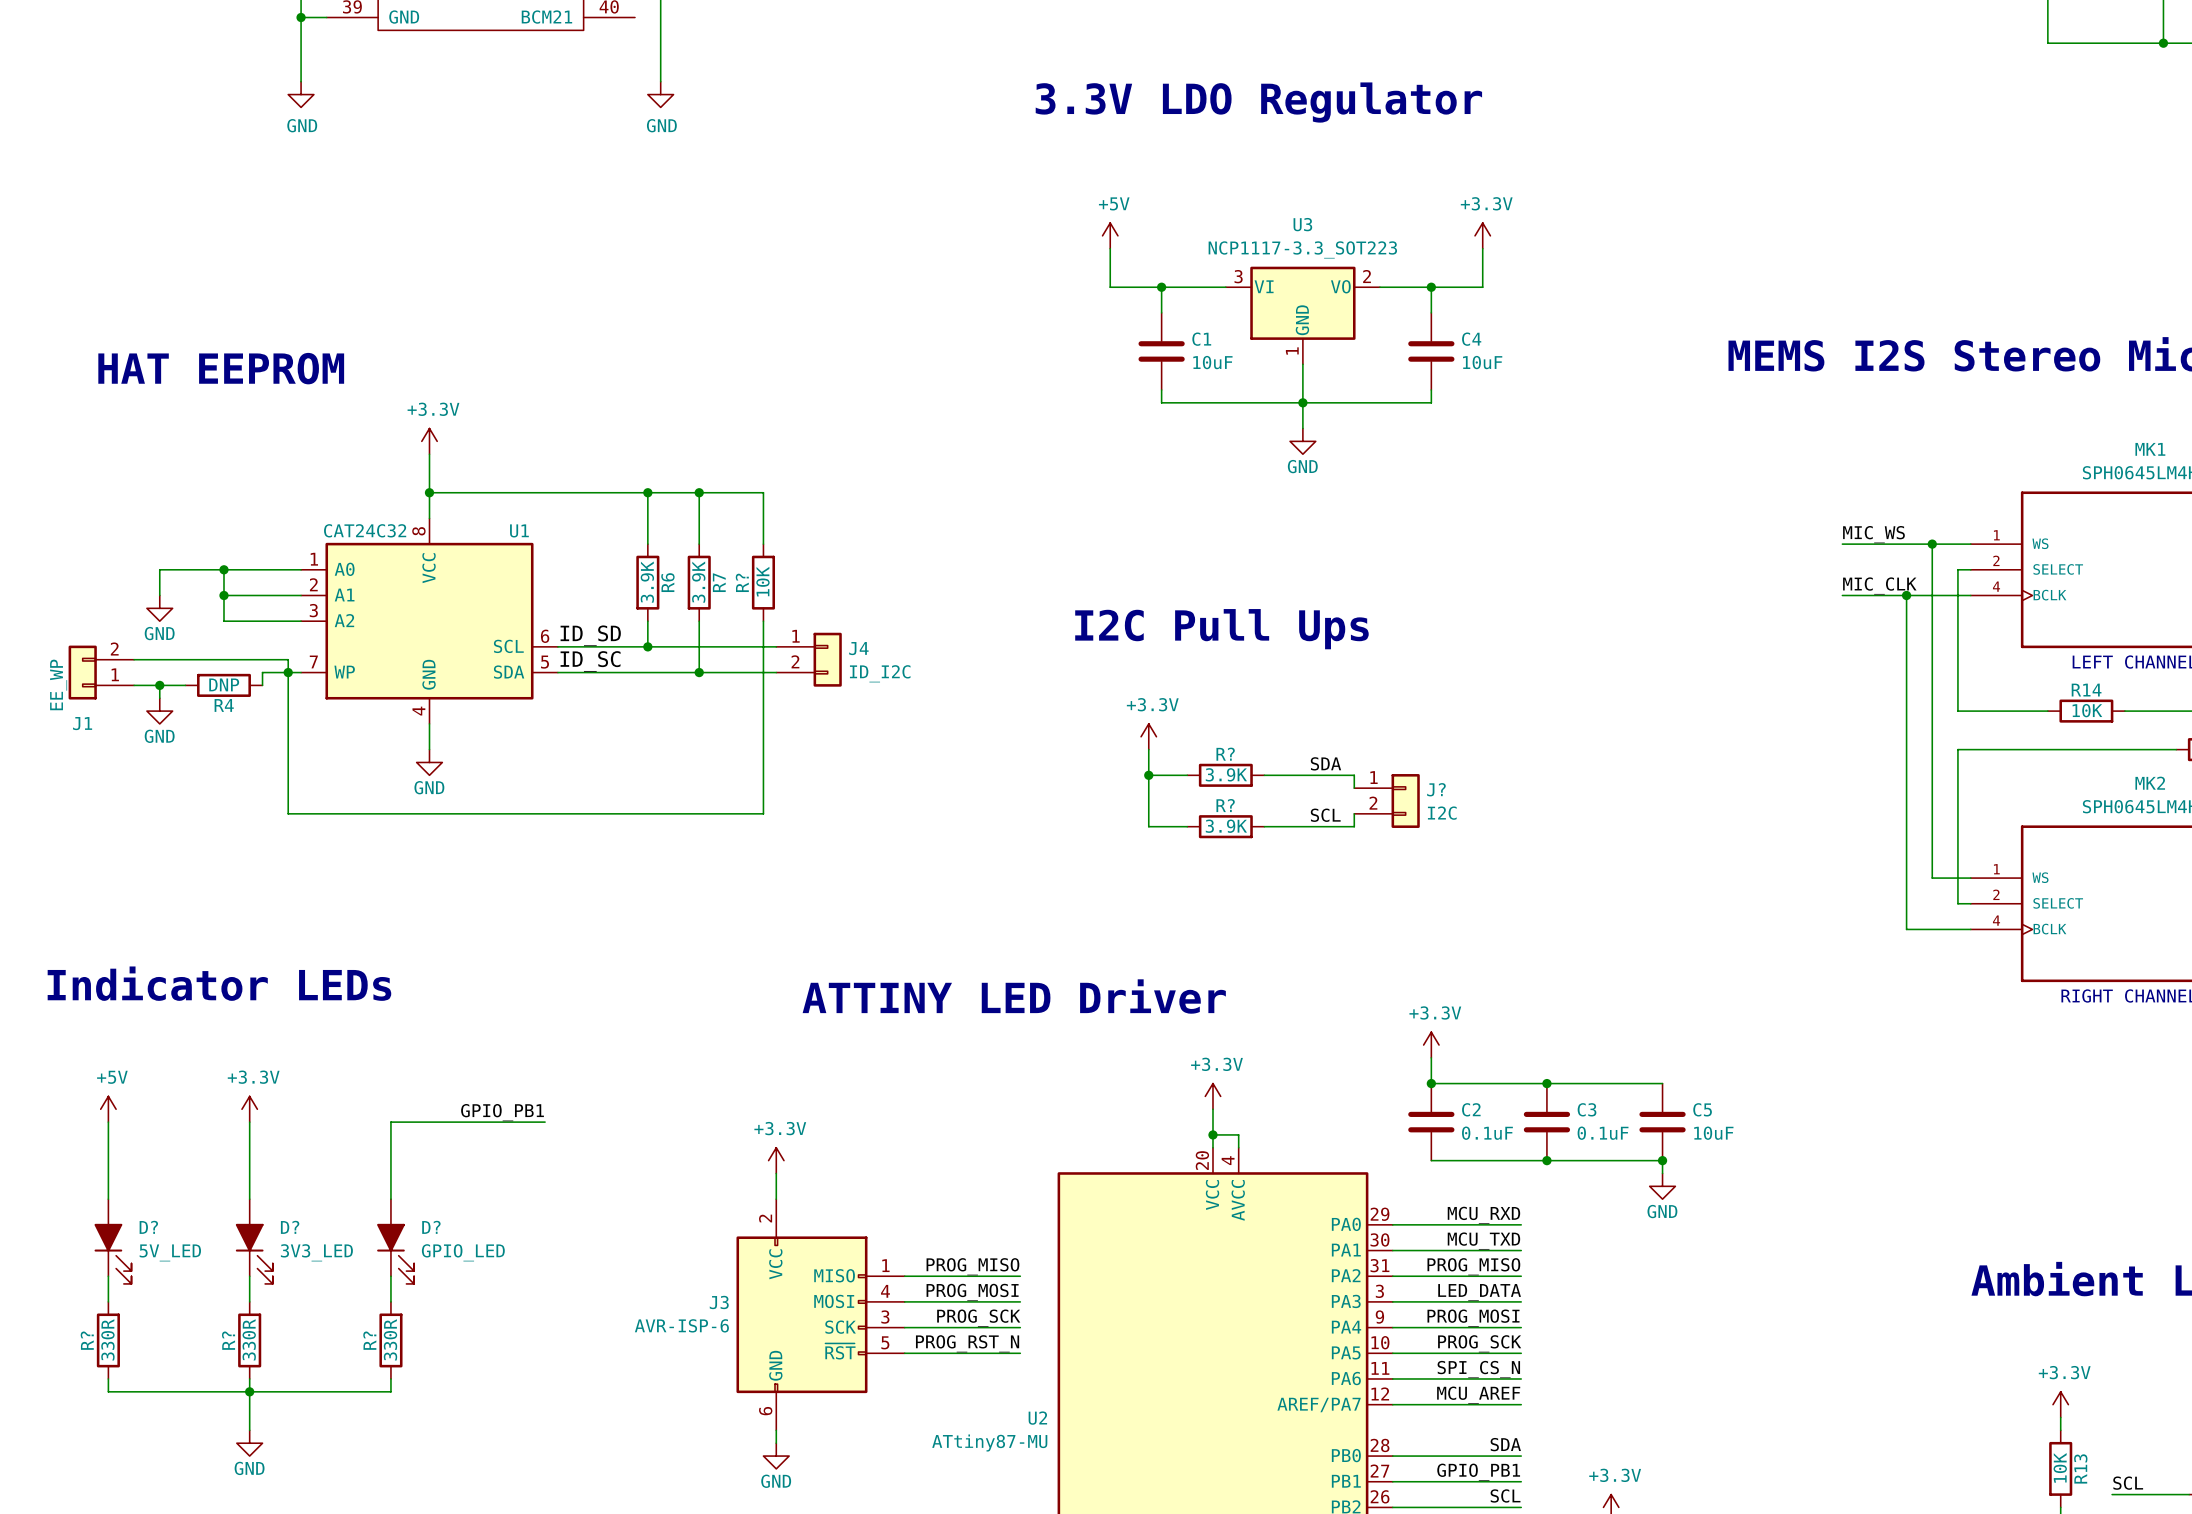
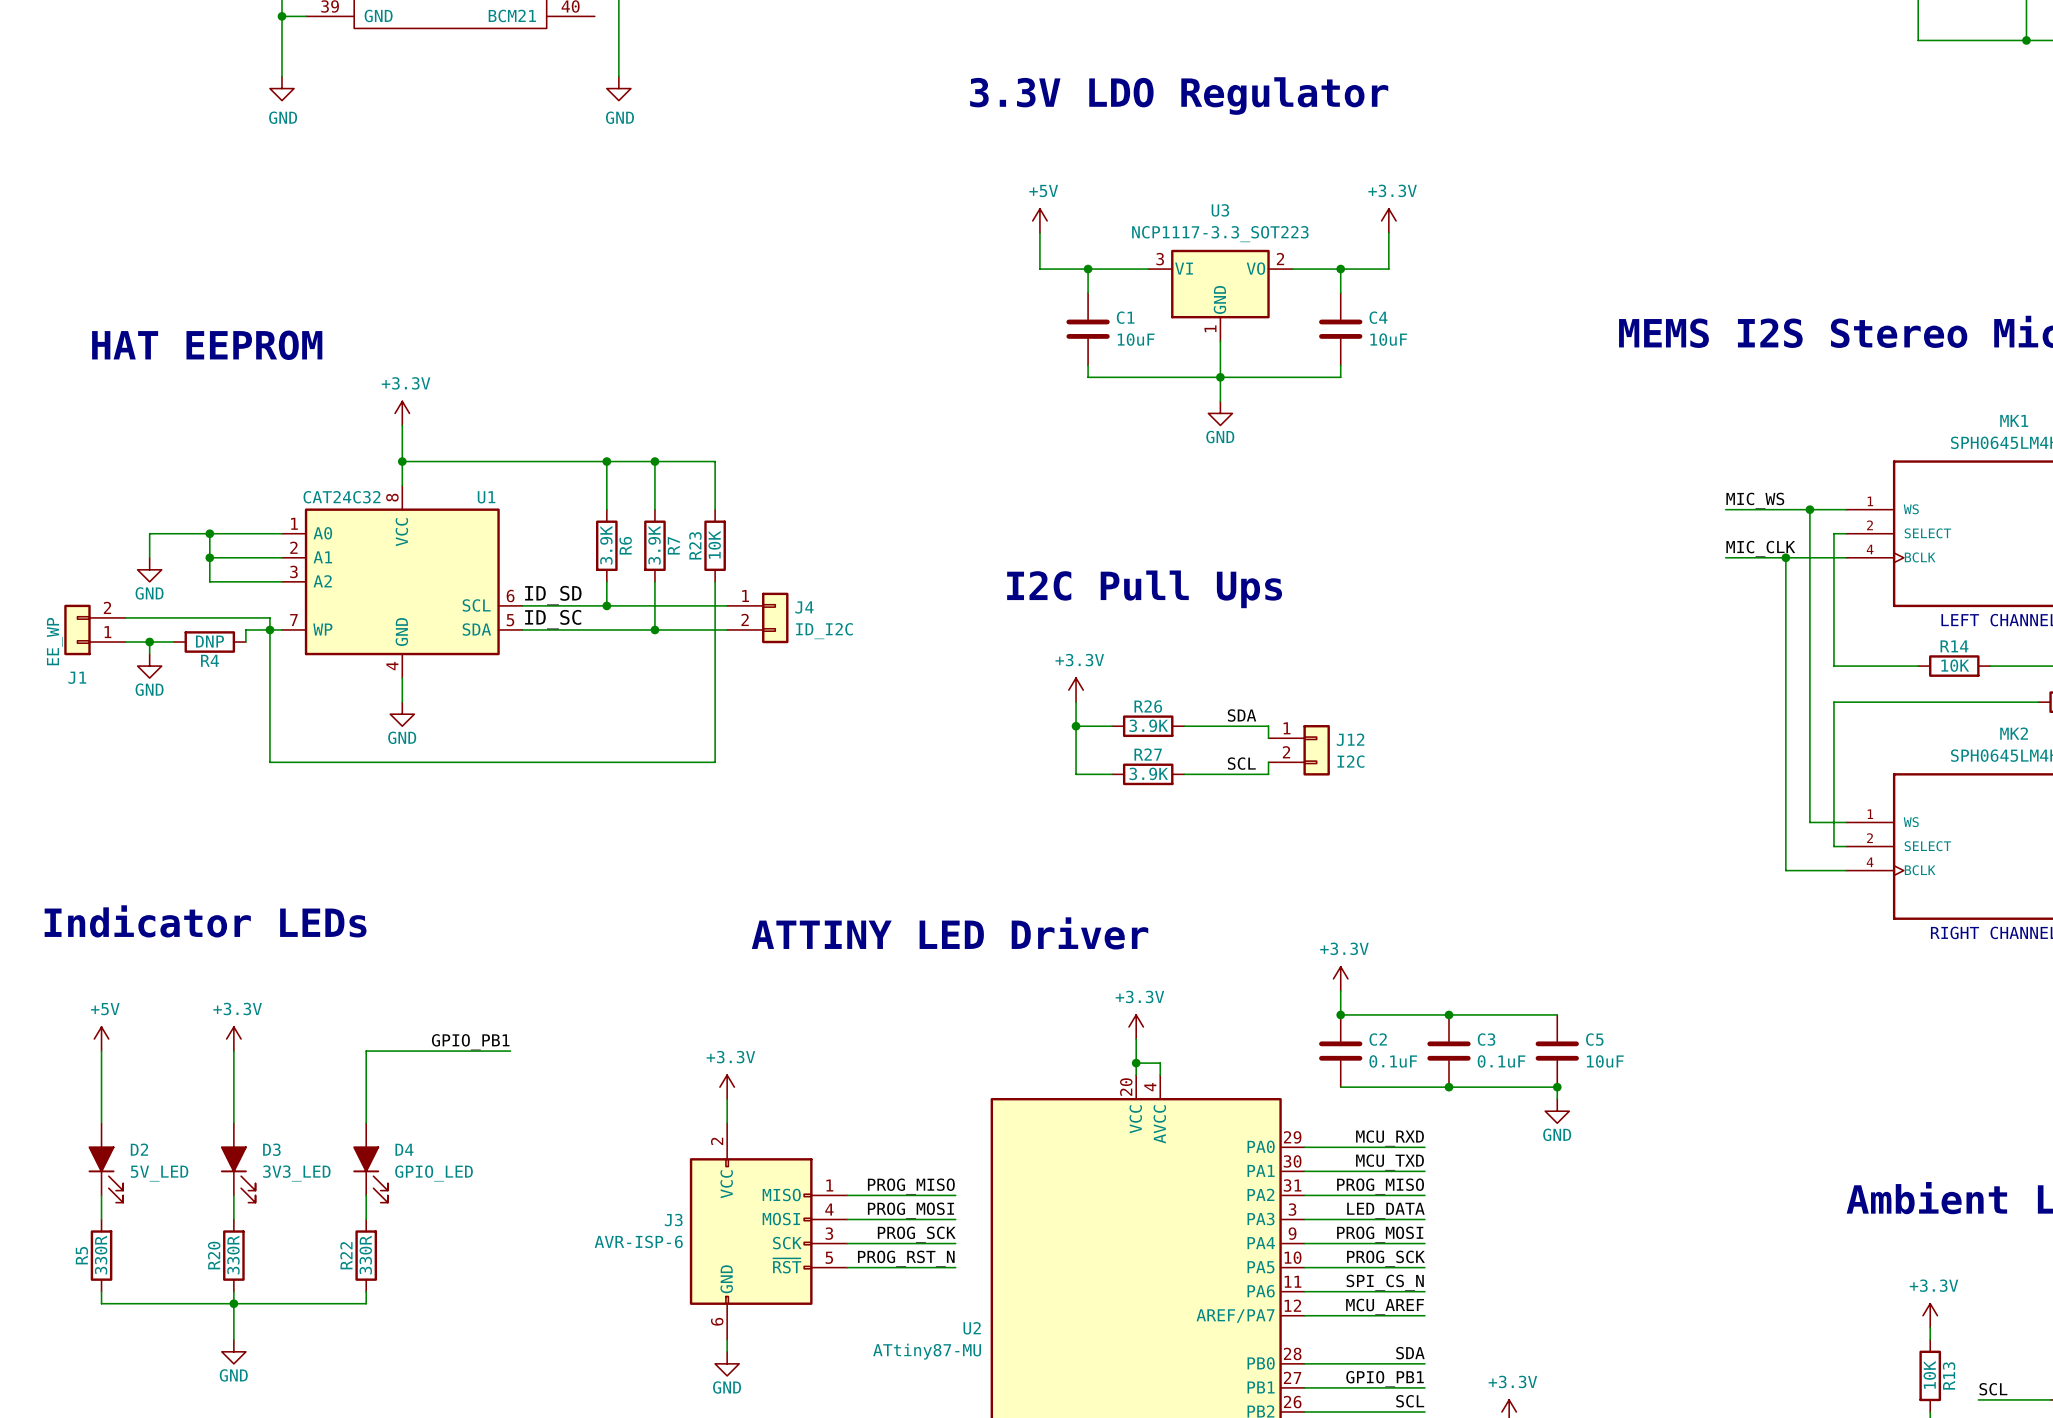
R? name: R? (742, 582) -> R23 (695, 545)
R? name: R? (1225, 754) -> R26 (1148, 706)
J? name: J? (1436, 789) -> J12 (1350, 739)
R? name: R? (1225, 805) -> R27 (1148, 754)
D? name: D? (148, 1227) -> D2 (139, 1149)
D? name: D? (290, 1227) -> D3 (271, 1149)
D? name: D? (431, 1227) -> D4 (404, 1149)
R? name: R? (87, 1340) -> R5 (81, 1255)
R? name: R? (228, 1340) -> R20 (214, 1255)
R? name: R? (369, 1340) -> R22 (346, 1255)

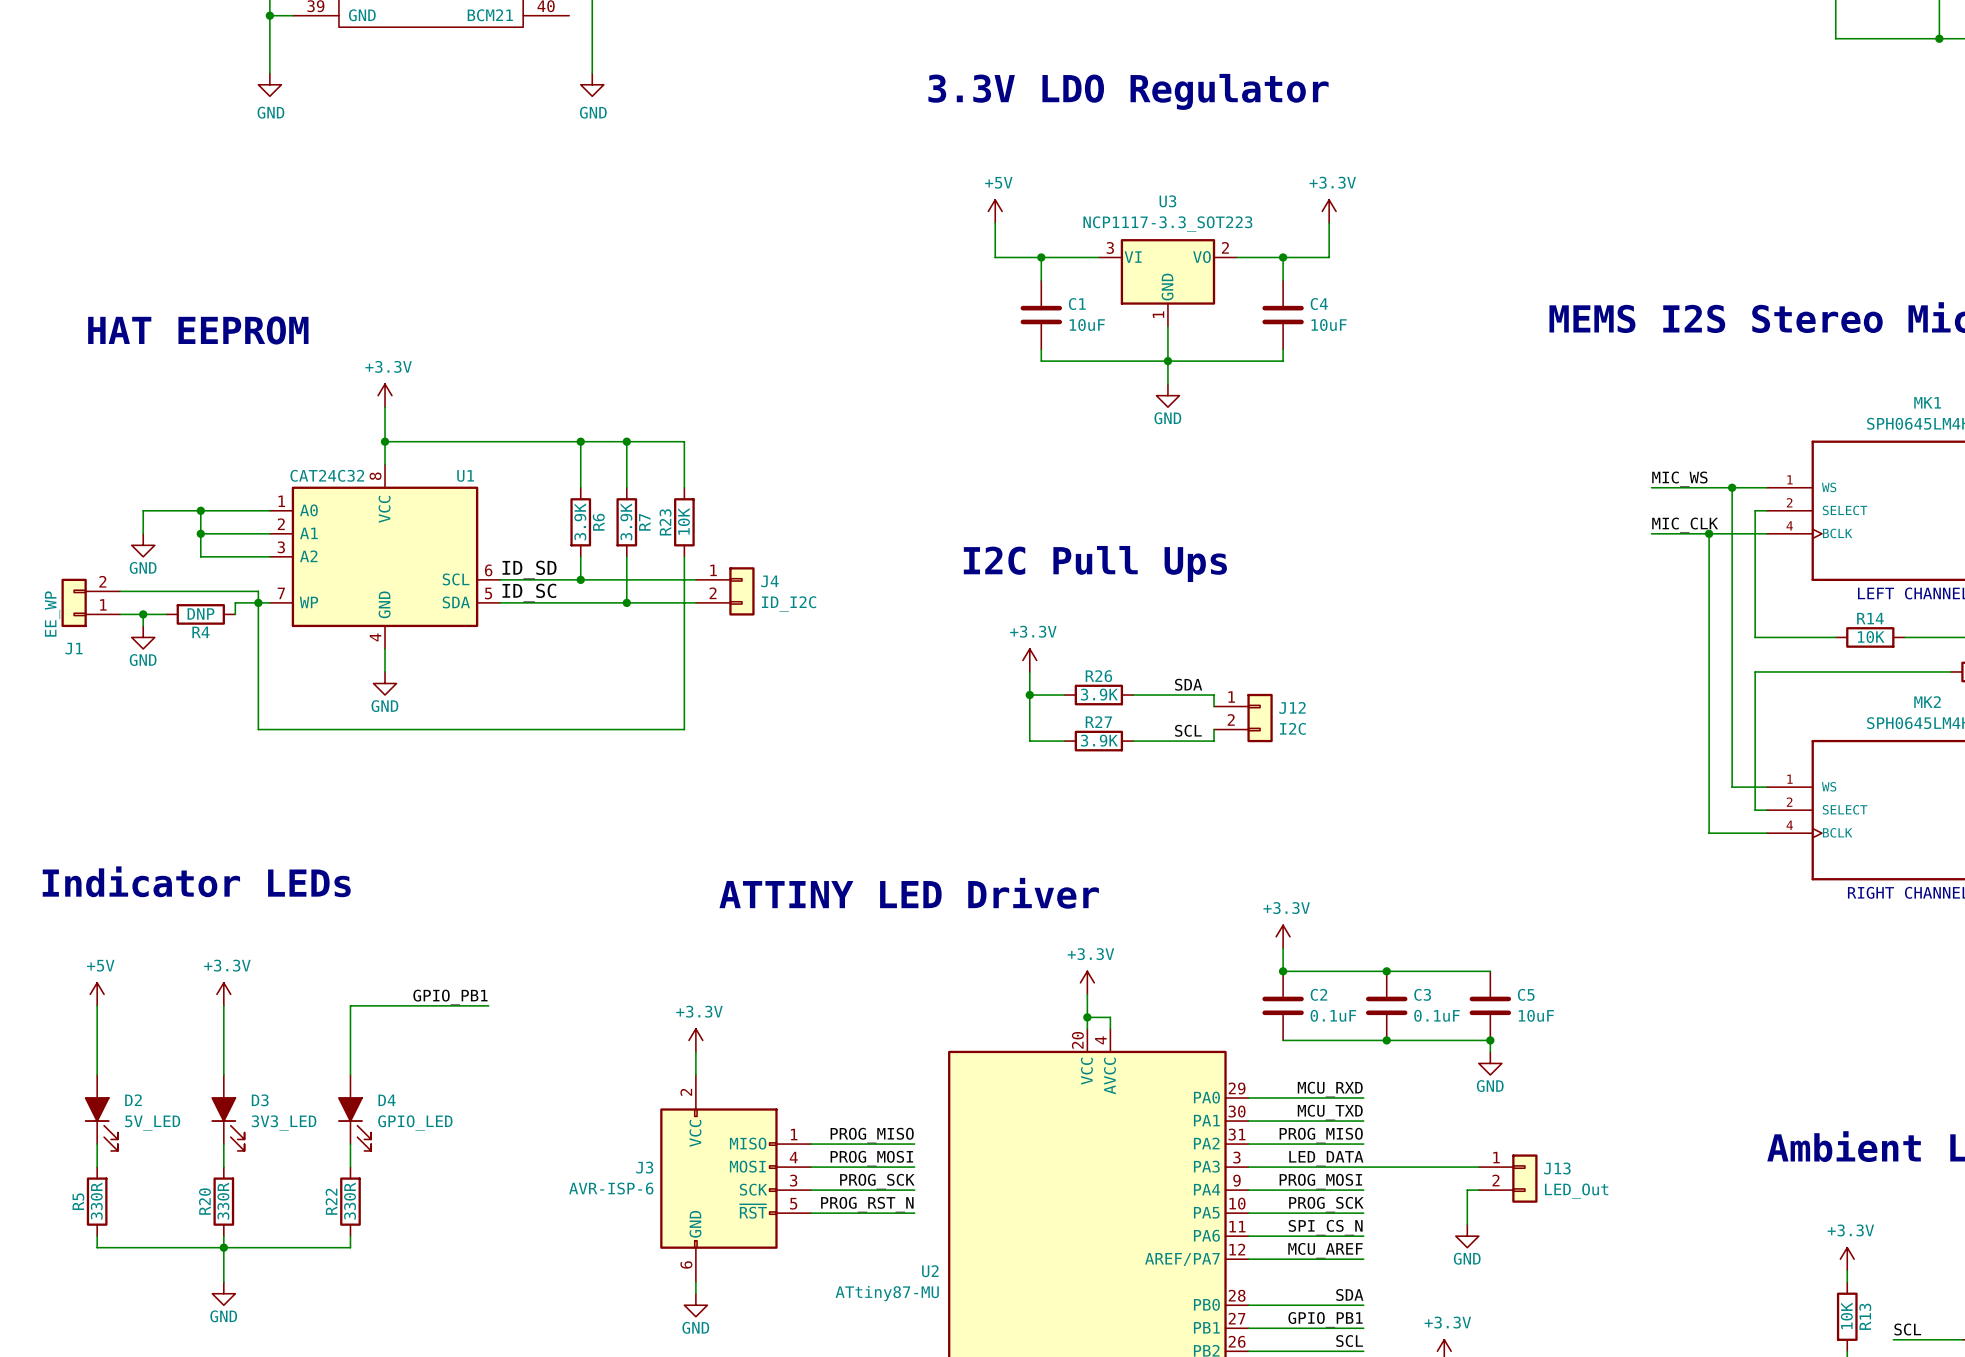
wire: none -> (1363, 1167) (1478, 1167)
J13: none -> LED_Out (1508, 1178)
wire: none -> (1478, 1190) (1467, 1190) (1467, 1224)
power symbol: none -> GND (1467, 1236)

